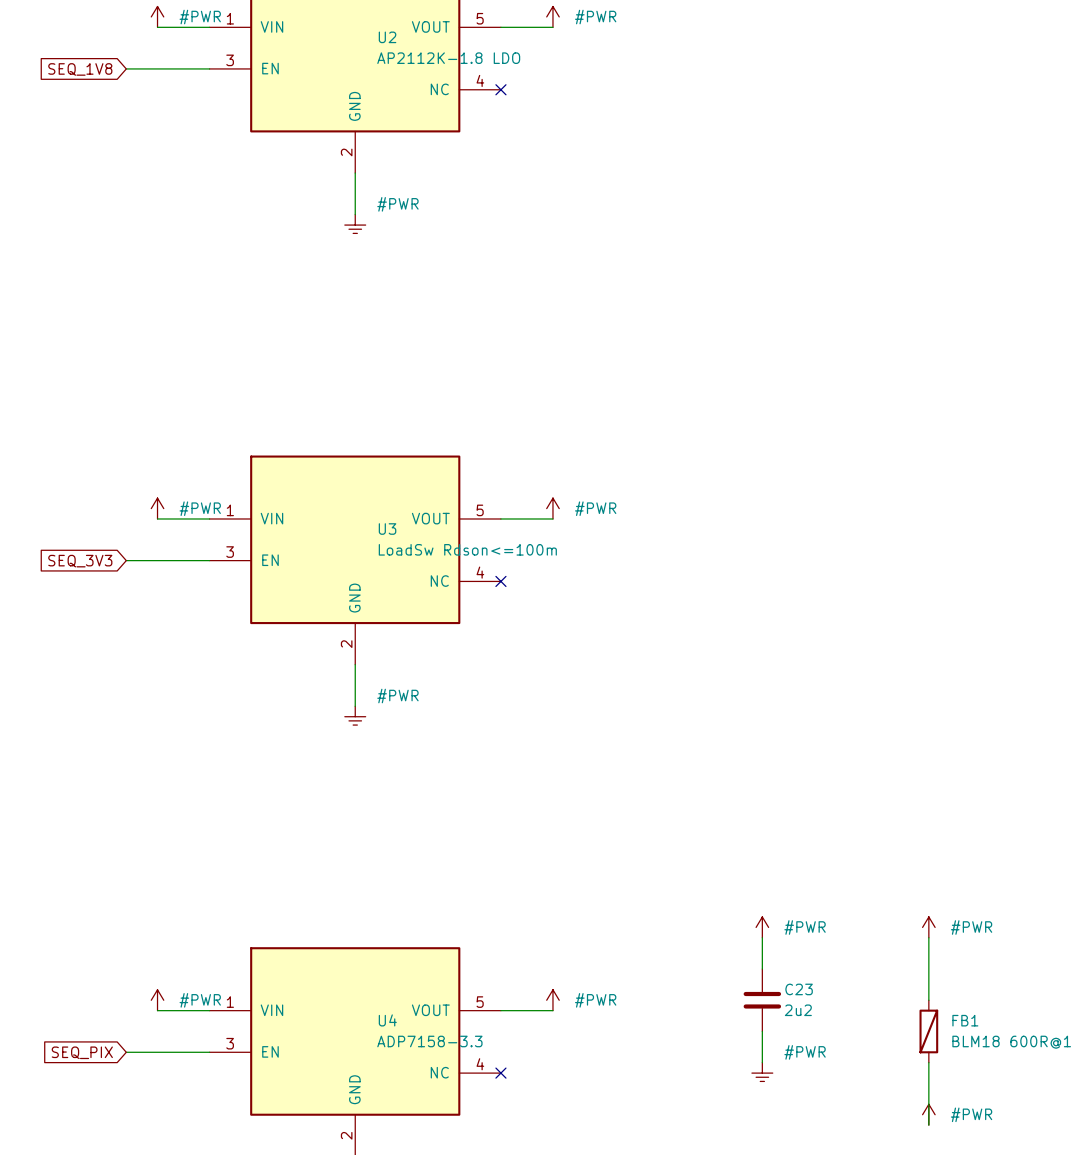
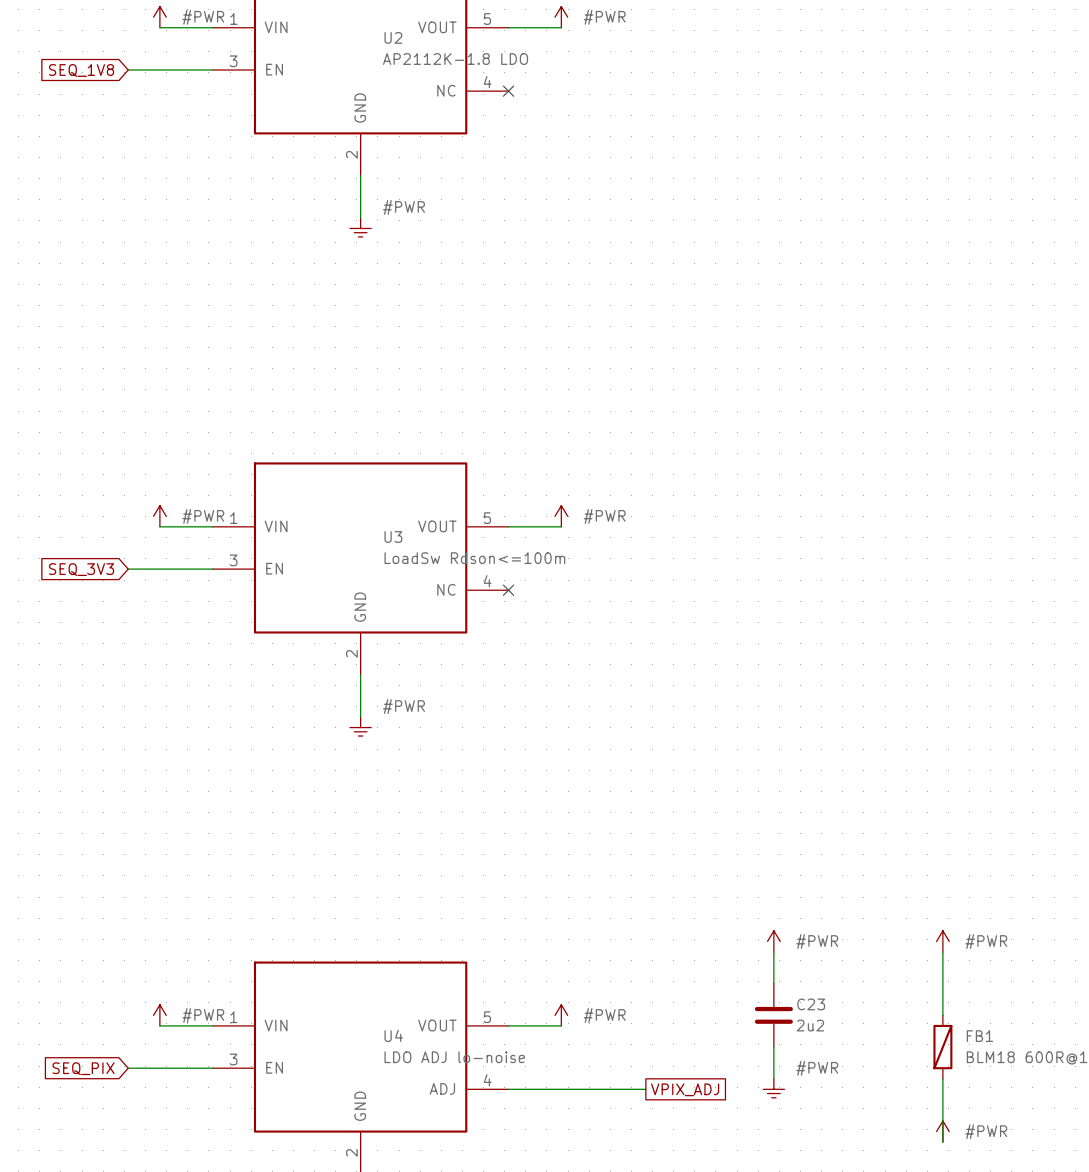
U4 value: ADP7158-3.3 (429, 1041) -> LDO ADJ lo-noise (454, 1057)
U4 pin name: NC (439, 1072) -> ADJ (442, 1088)
wire: none -> (508, 1089) (645, 1089)
no-connect mark: (500, 1073) -> none
global label: none -> VPIX_ADJ (685, 1089)

